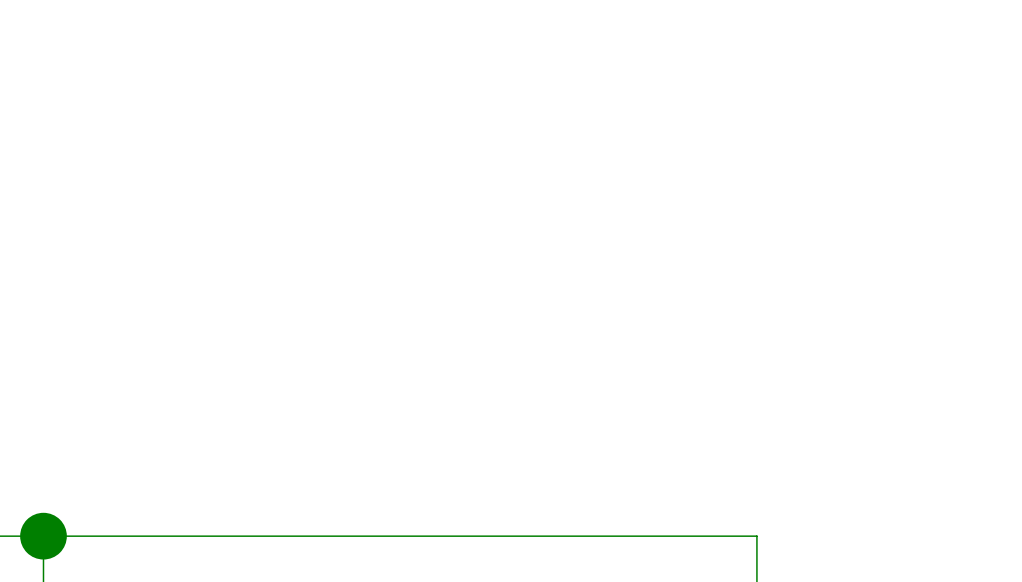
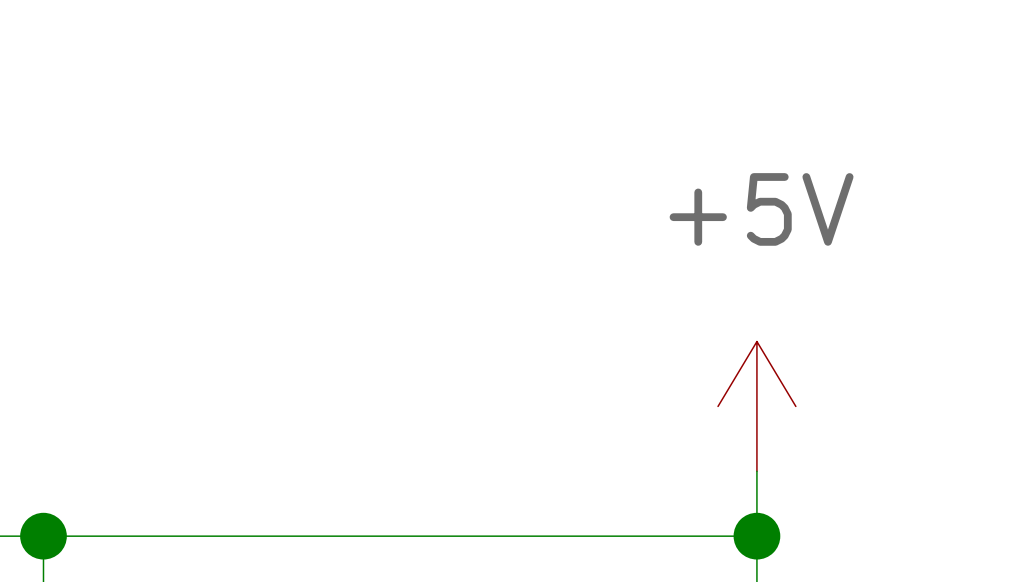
power symbol: none -> +5V (756, 406)
wire: none -> (756, 471) (756, 536)
junction: none -> (756, 536)

